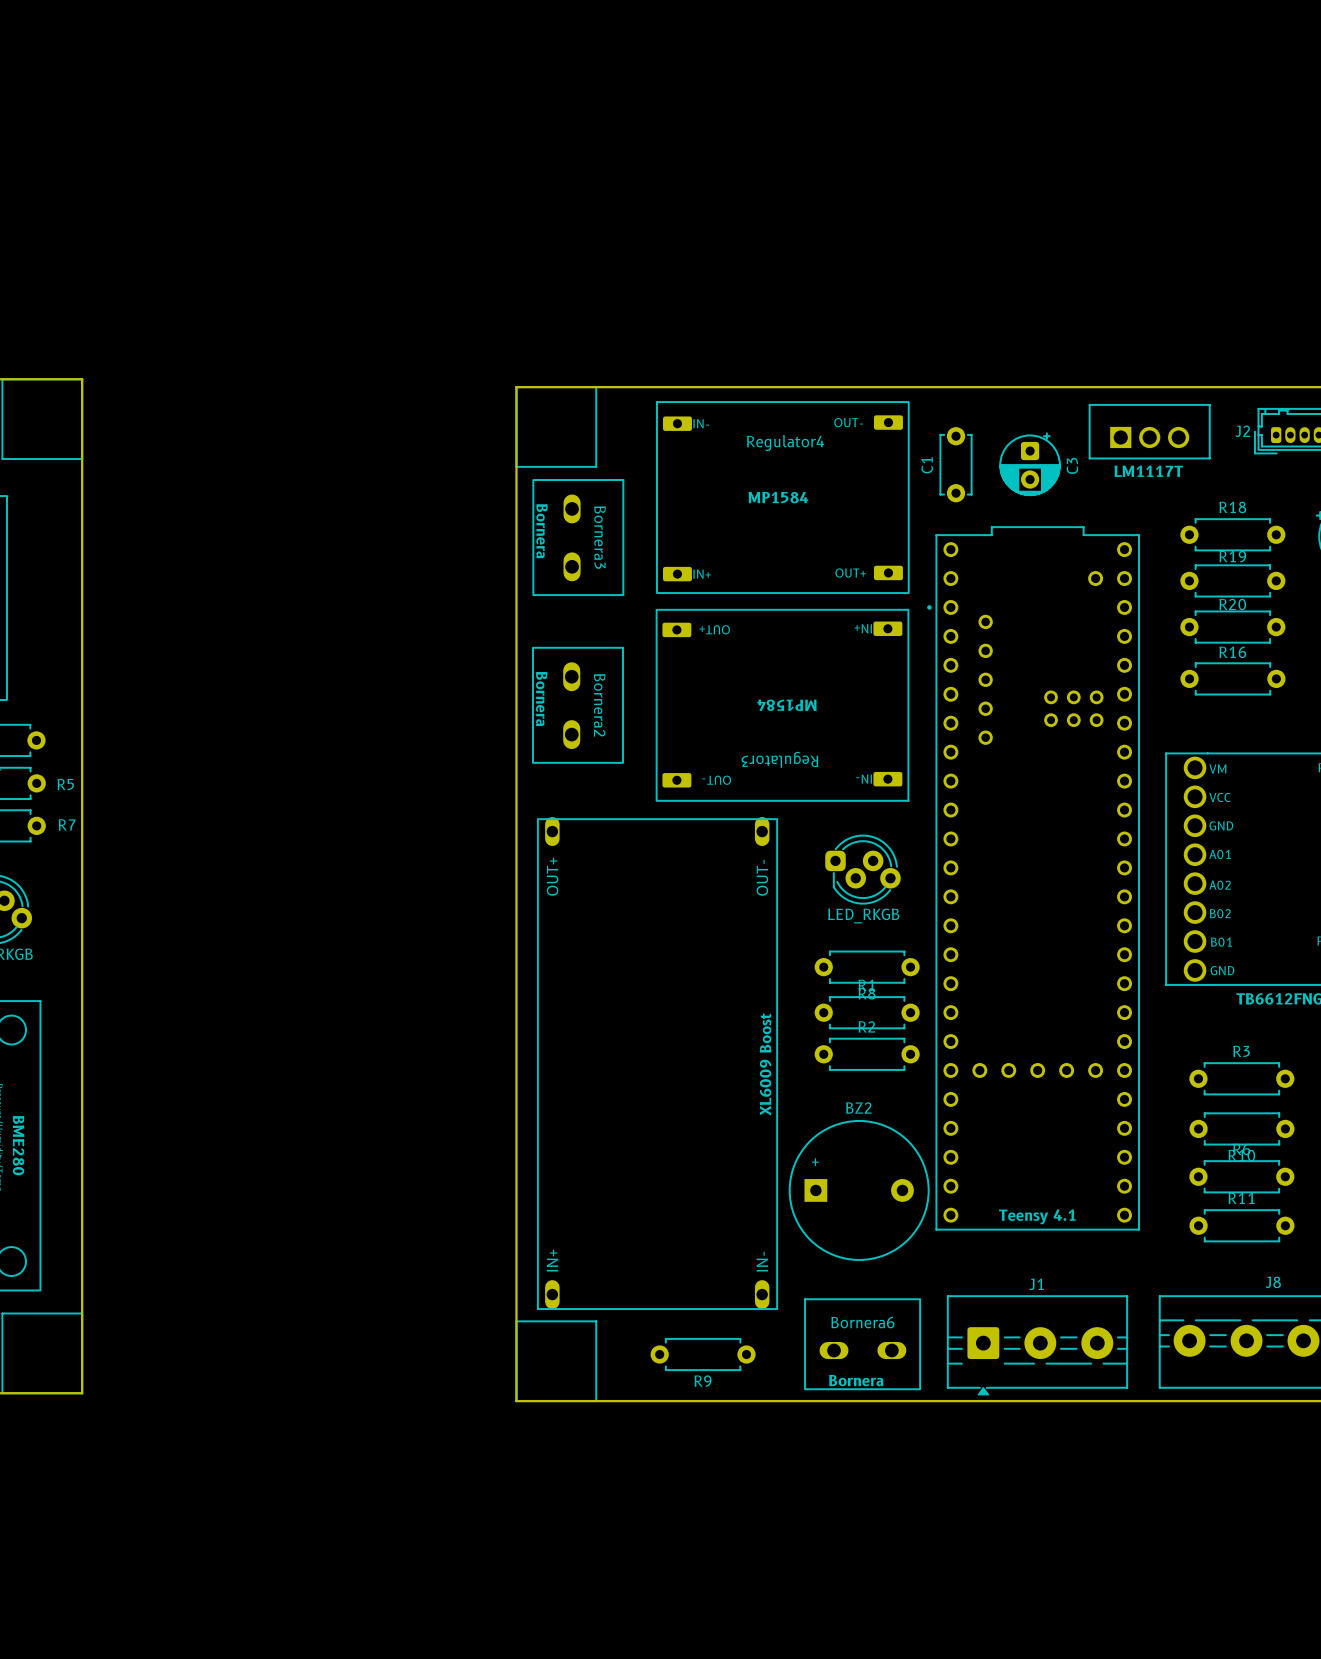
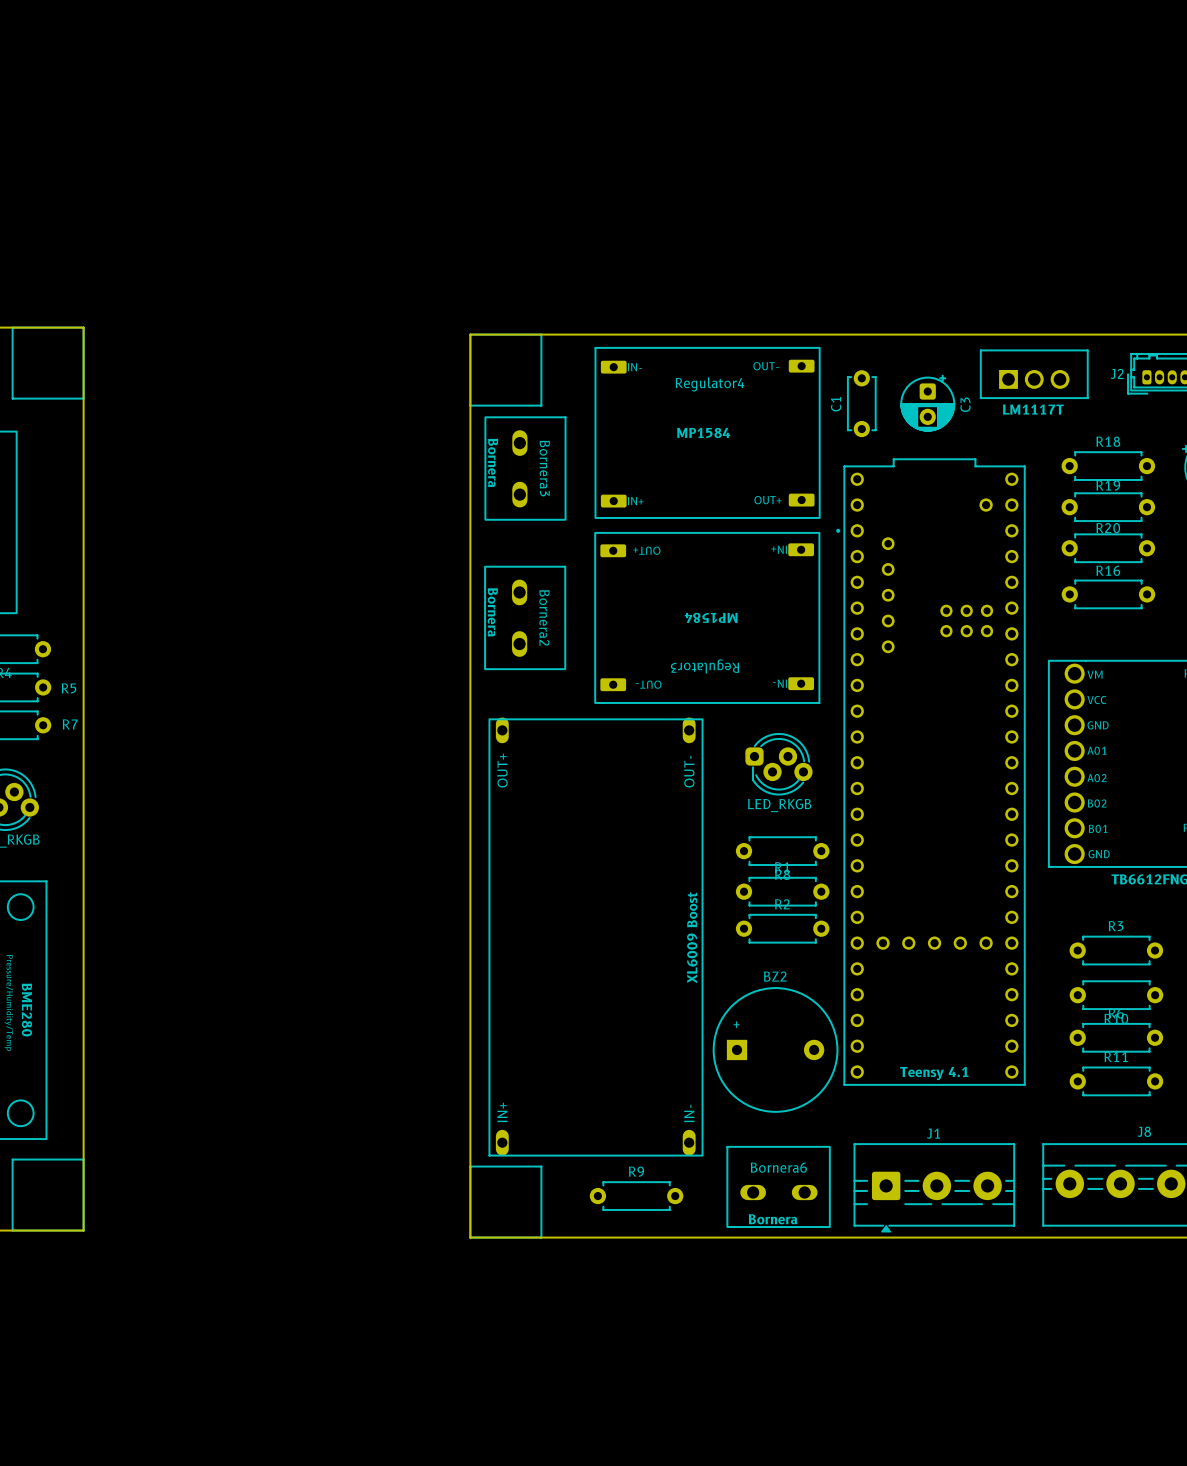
R9 name position: R9 (703, 1381) -> R9 (636, 1171)

